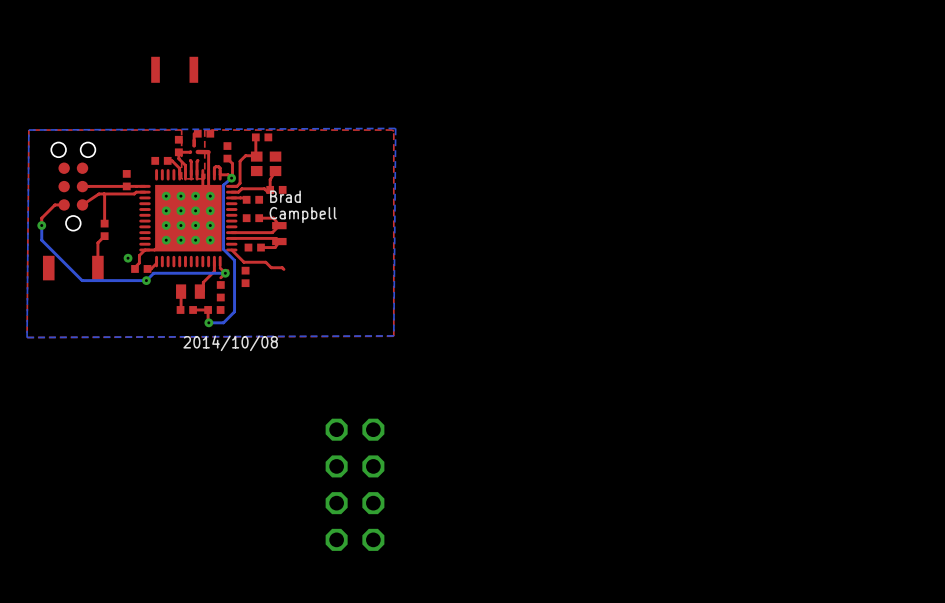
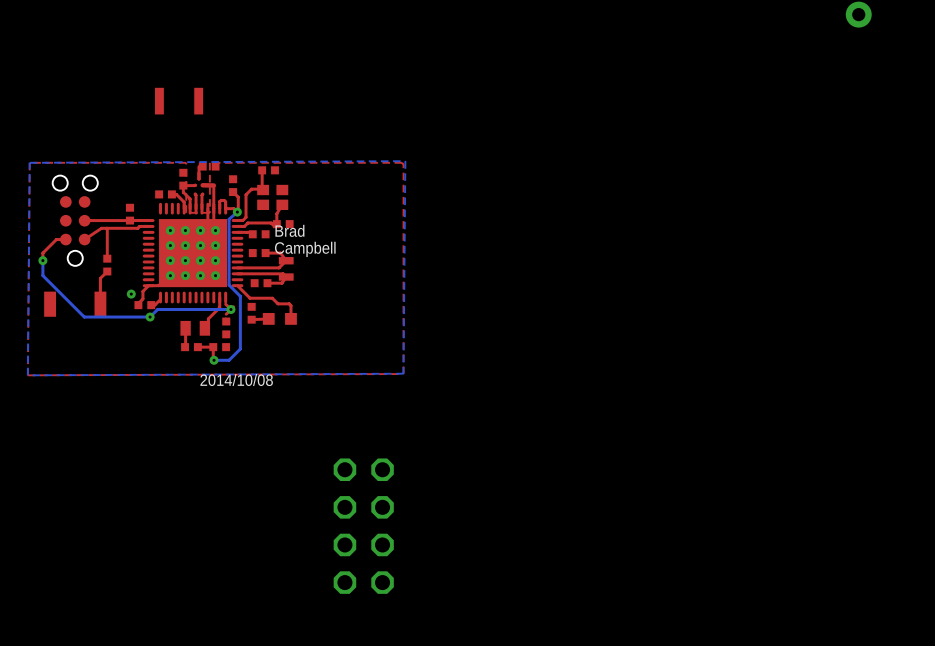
top track: none -> (290, 305) (290, 318)
top track: none -> (268, 318) (251, 319)
part: none -> (279, 318)

